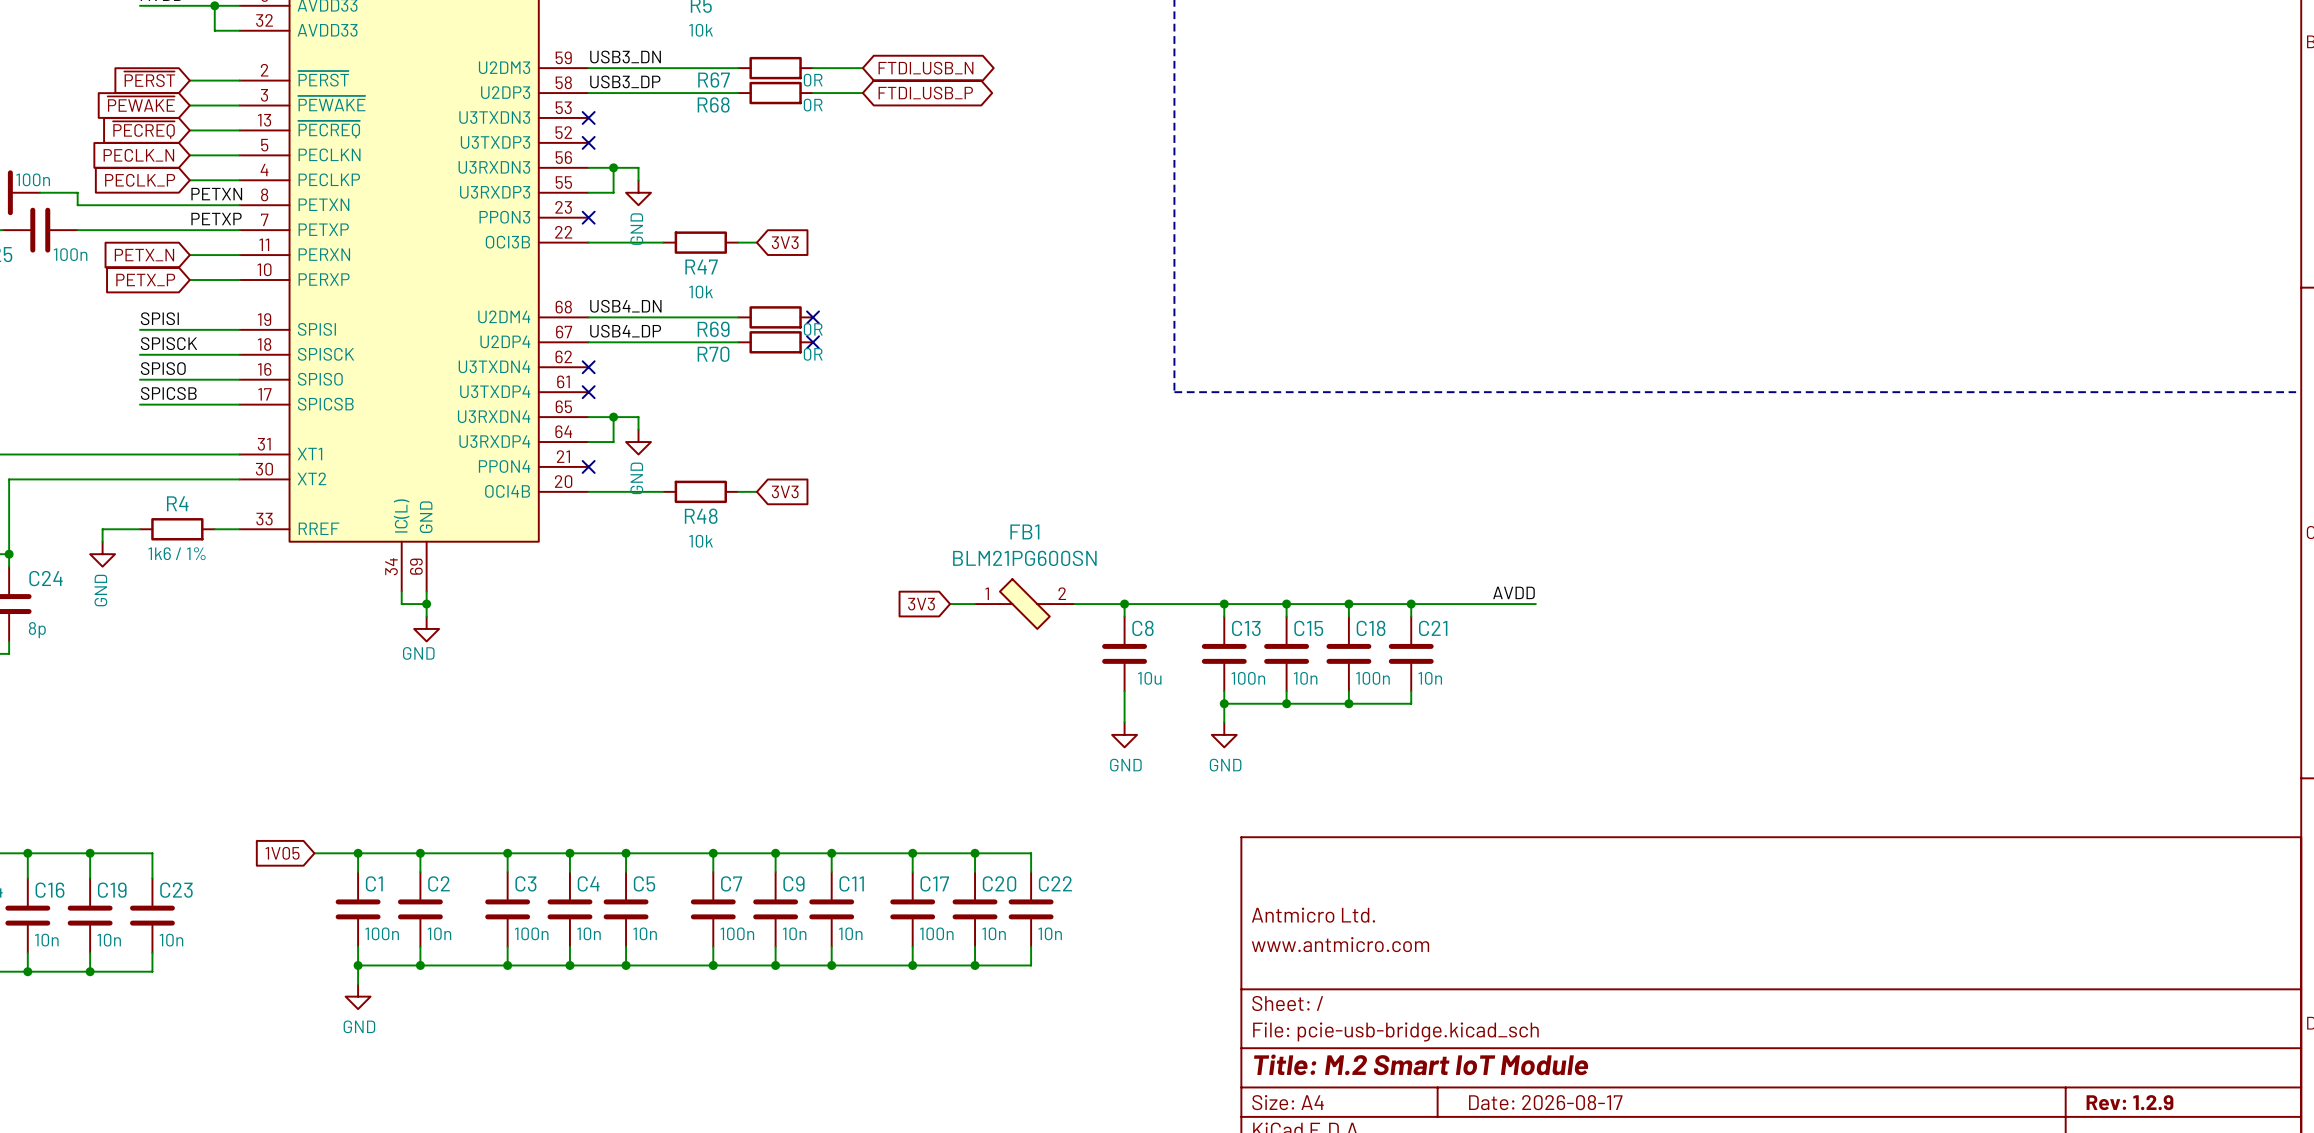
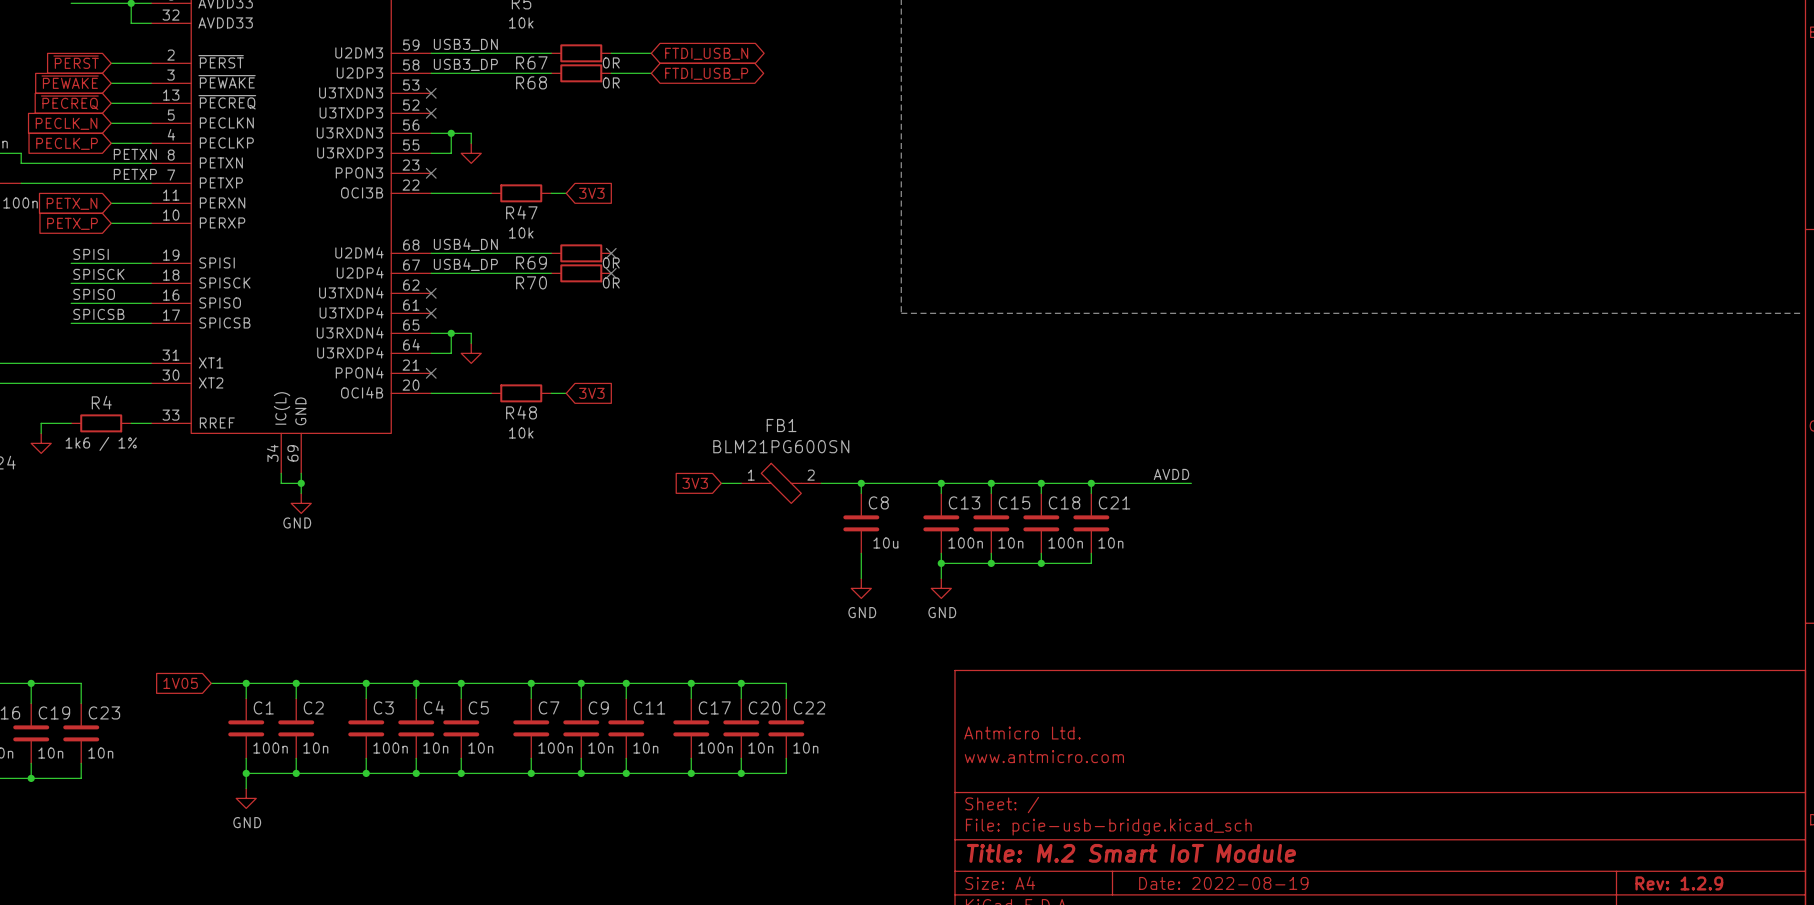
power symbol text: GND (636, 229) -> none
power symbol text: GND (636, 478) -> none
power symbol text: GND (100, 590) -> none
title block: Date: 2026-08-17 (1545, 1102) -> Date: 2022-08-19 (1223, 883)

